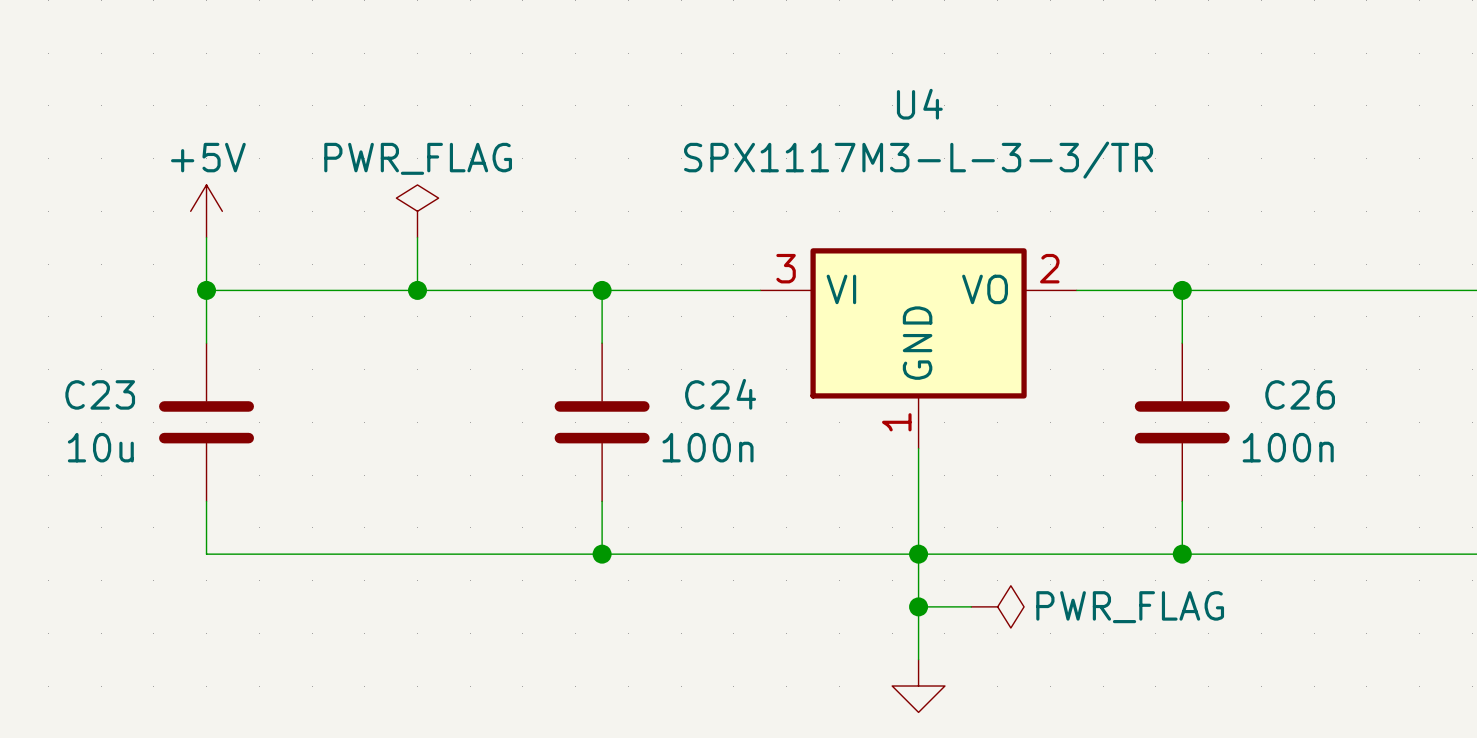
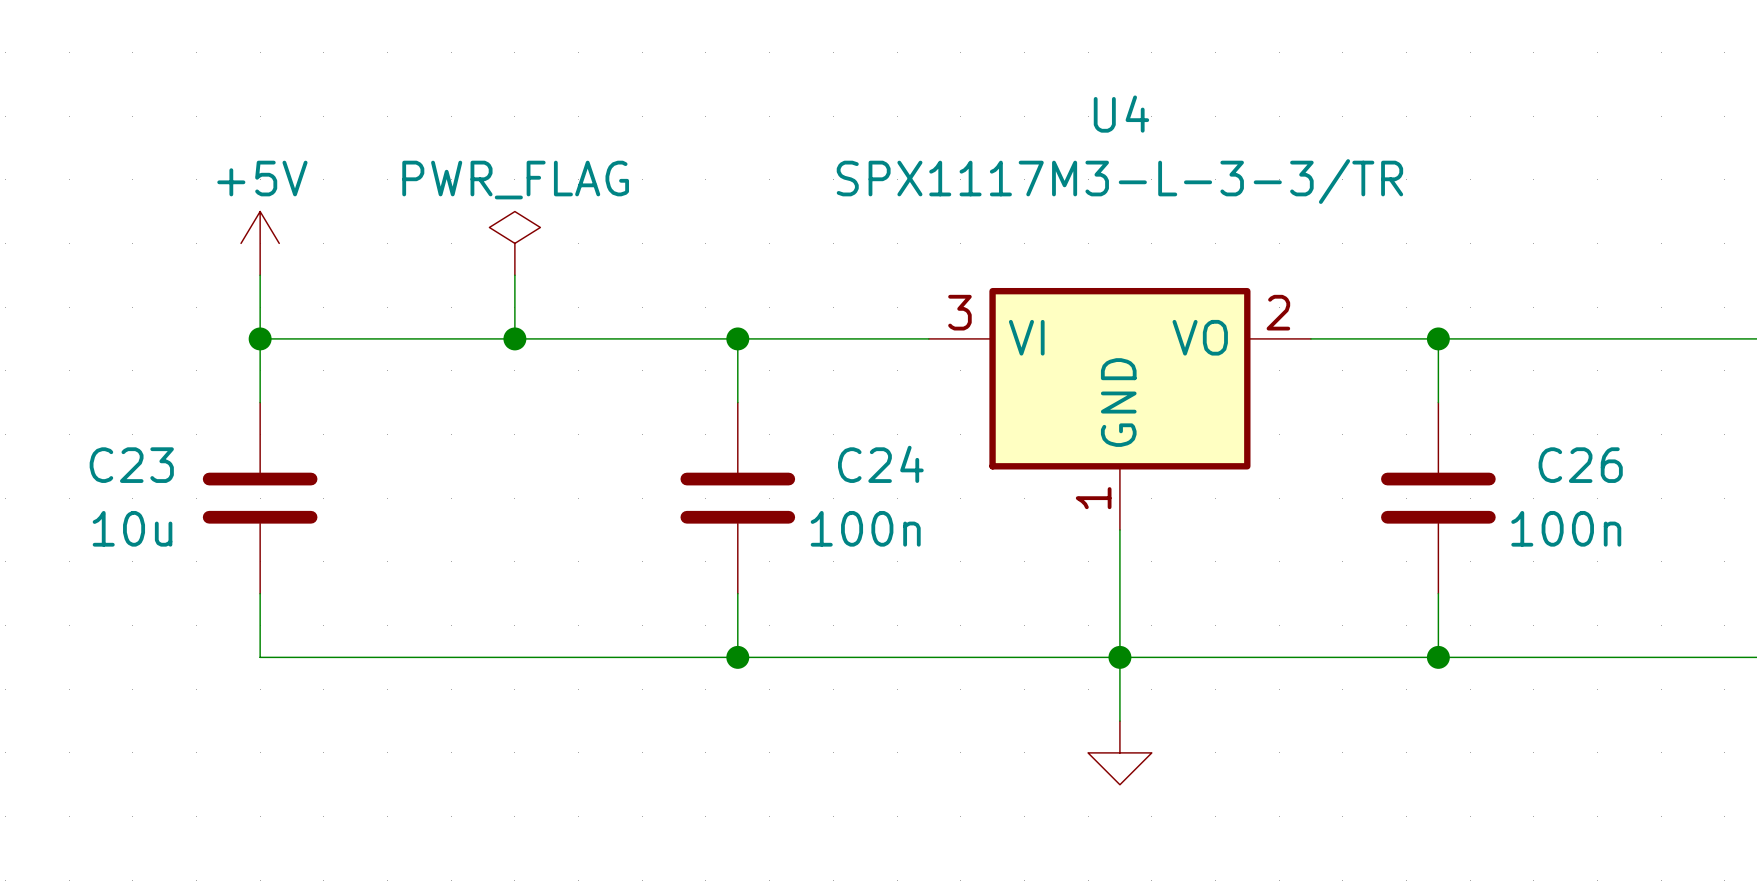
junction: (918, 606) -> none
wire: (971, 606) (918, 606) (918, 659) -> none
power symbol: PWR_FLAG (997, 606) -> none
power symbol position: (918, 686) -> (1119, 752)

